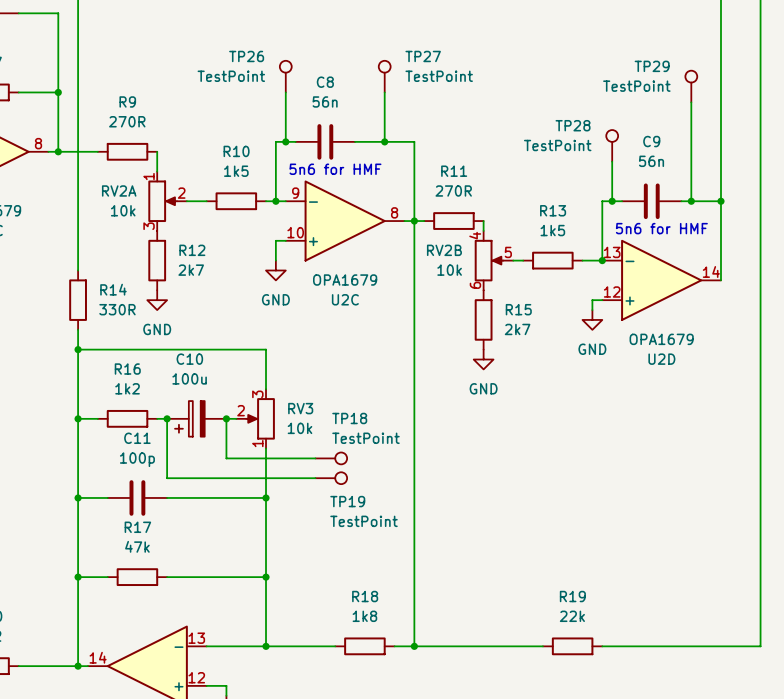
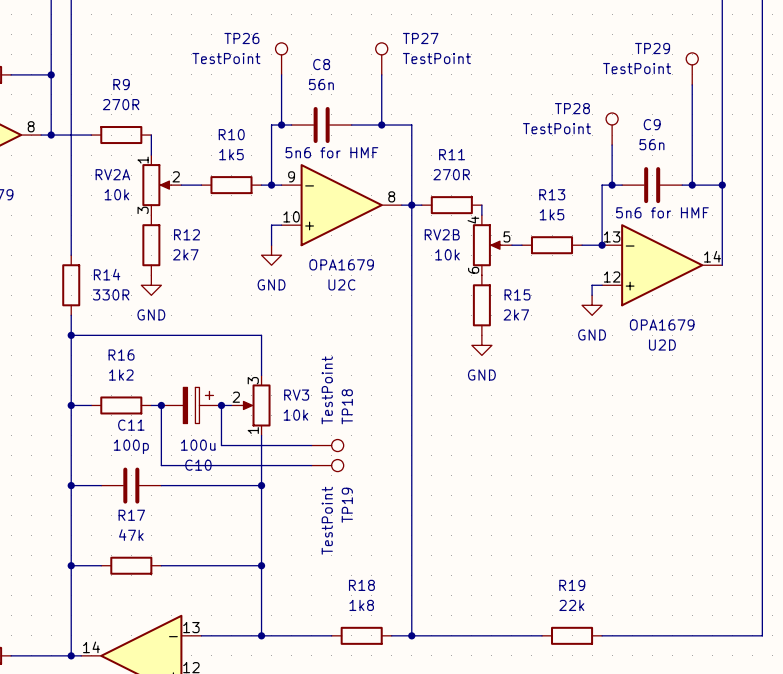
C10 rotation: 0° (189, 418) -> 180° (198, 405)
TP18 name rotation: 0° (349, 418) -> 90° counterclockwise (347, 406)
TP18 value rotation: 0° (365, 438) -> 90° counterclockwise (327, 390)
TP19 name rotation: 0° (347, 501) -> 90° counterclockwise (347, 505)
TP19 value rotation: 0° (364, 521) -> 90° counterclockwise (327, 520)

